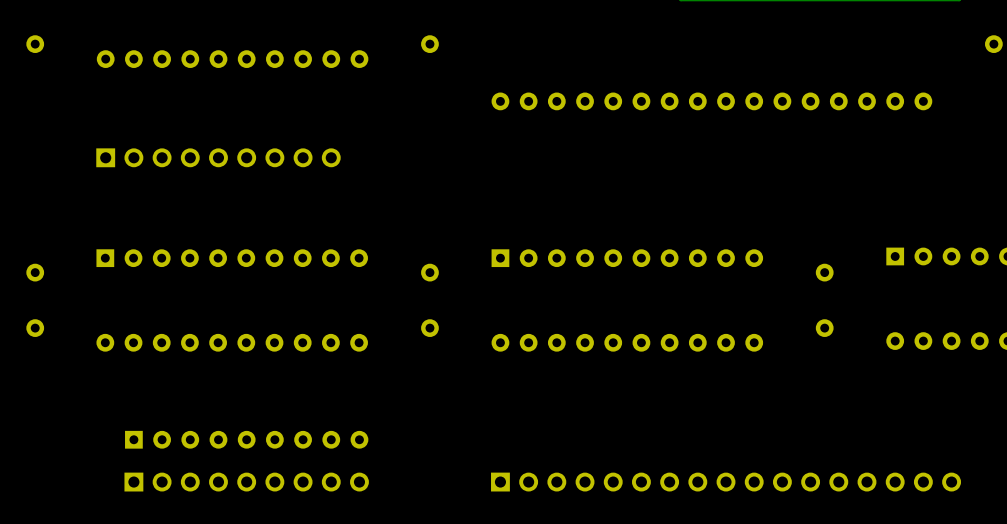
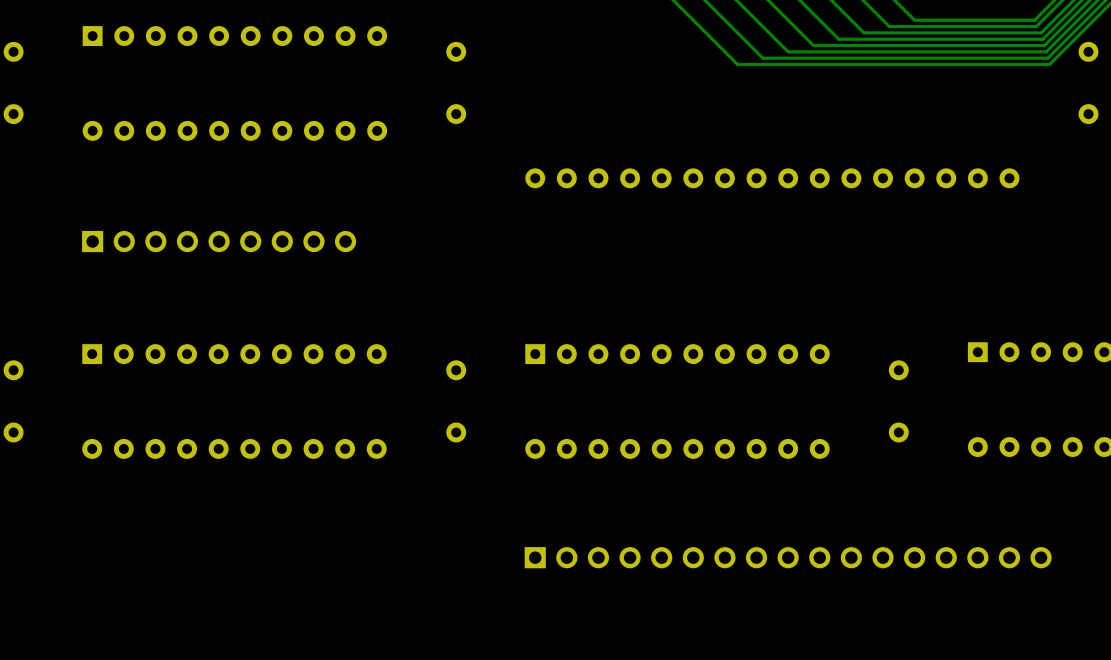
part: (246, 439) -> none
part: (246, 482) -> none
part position: (726, 482) -> (788, 557)

